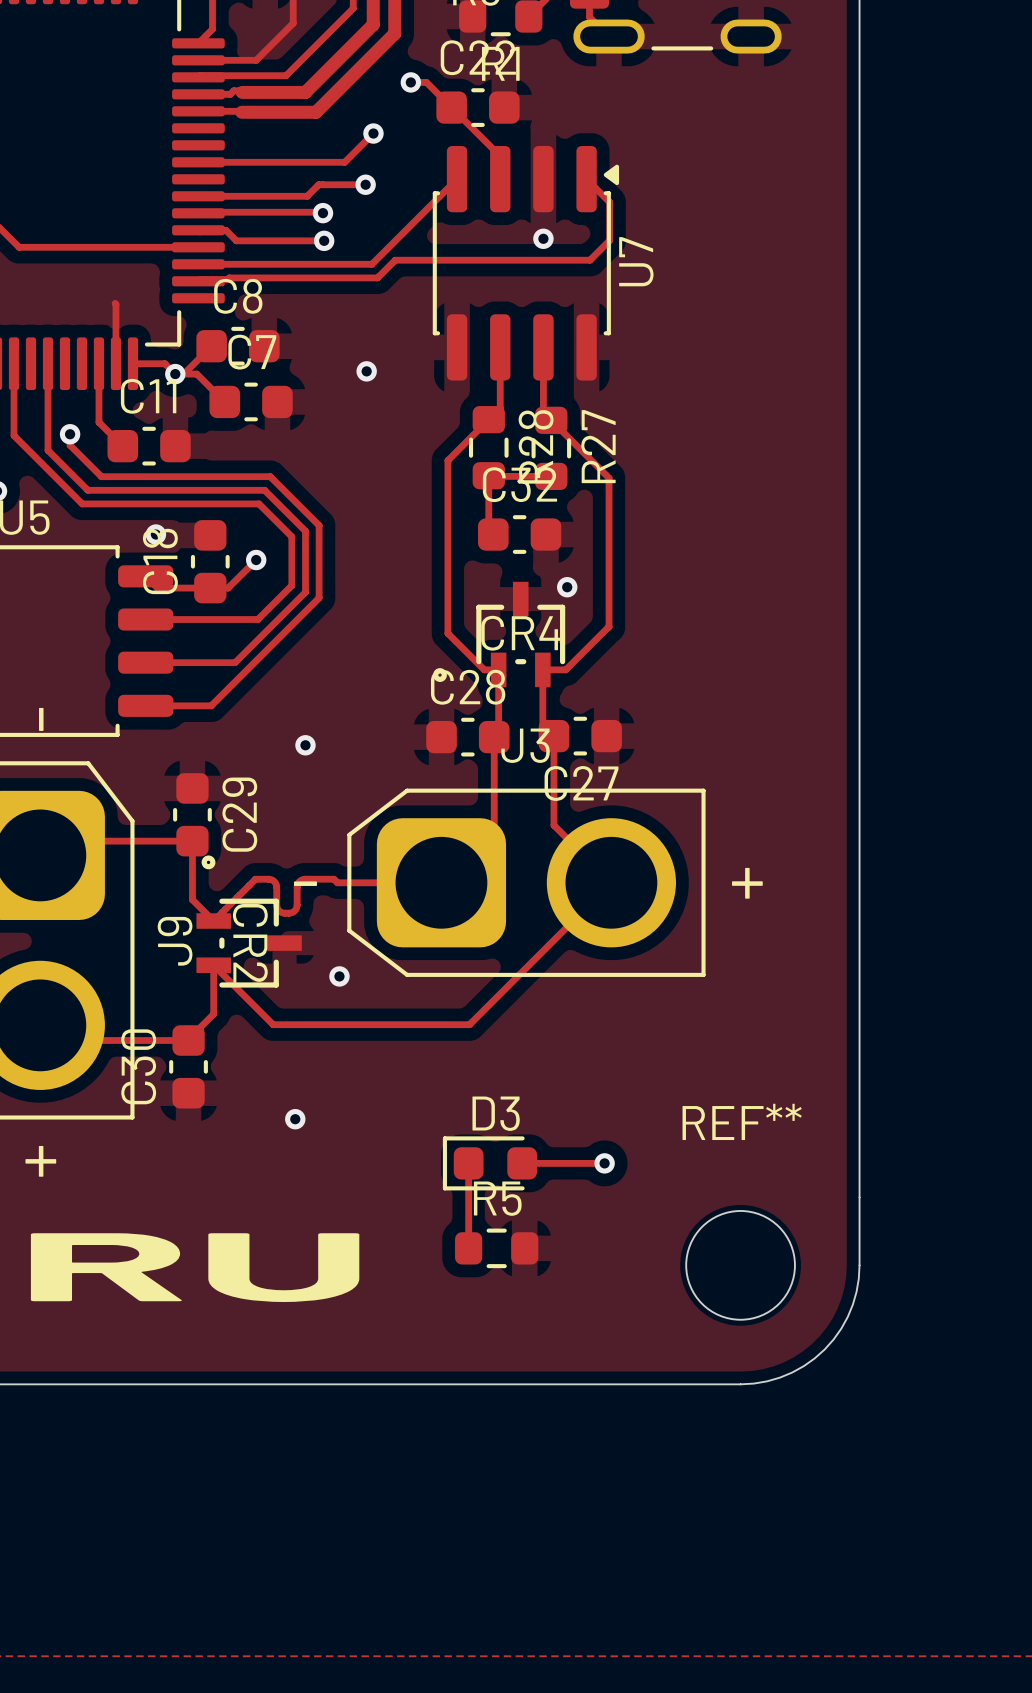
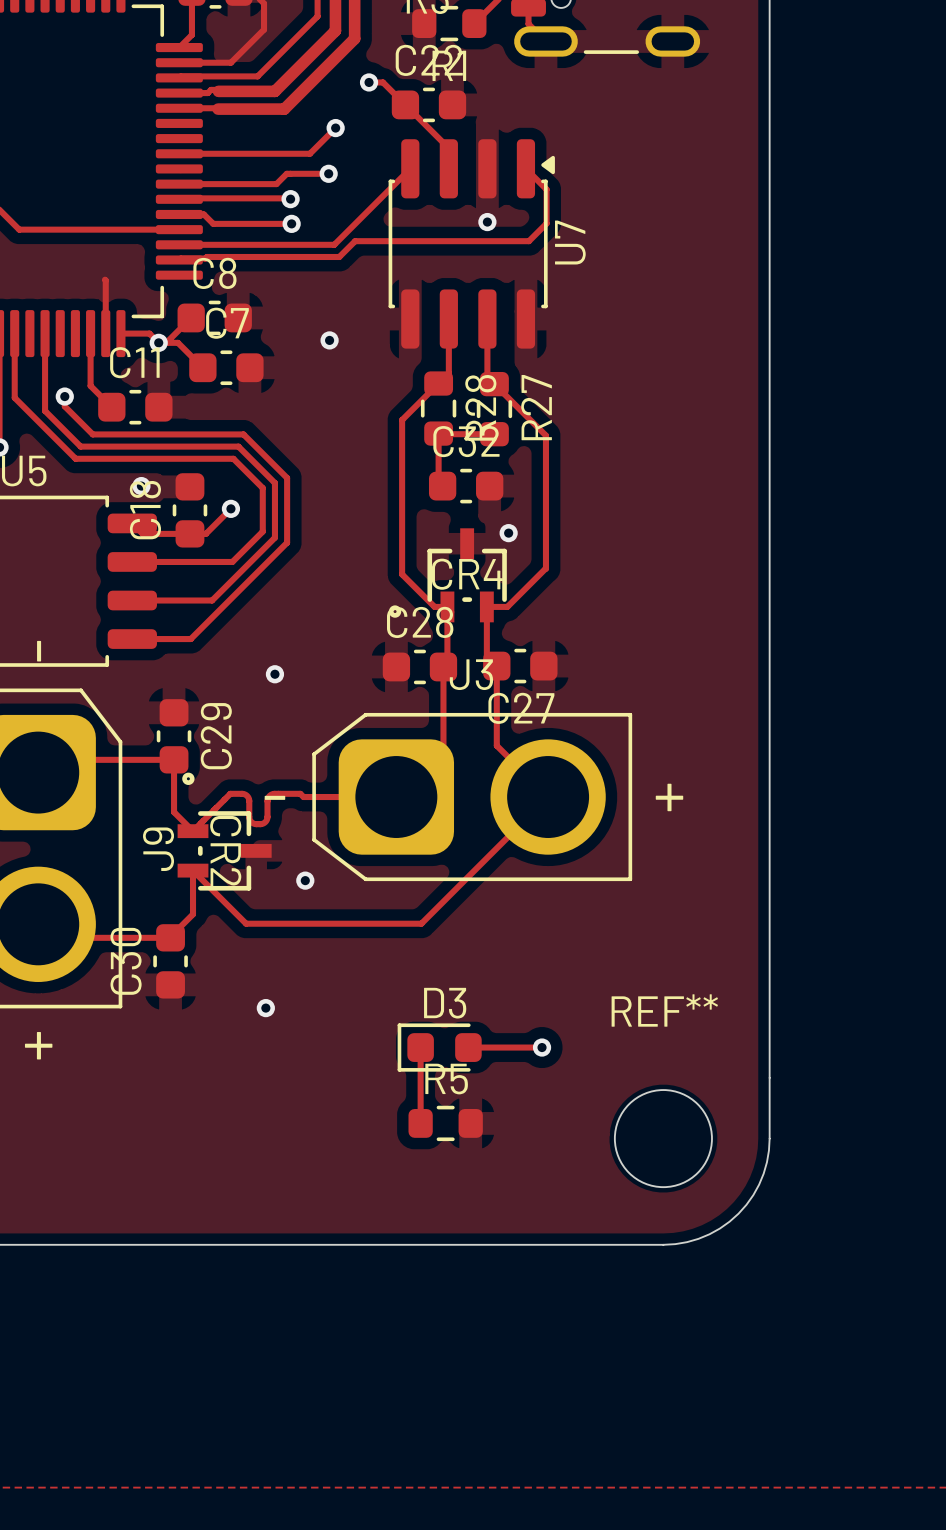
text: RU (195, 1267) -> none

